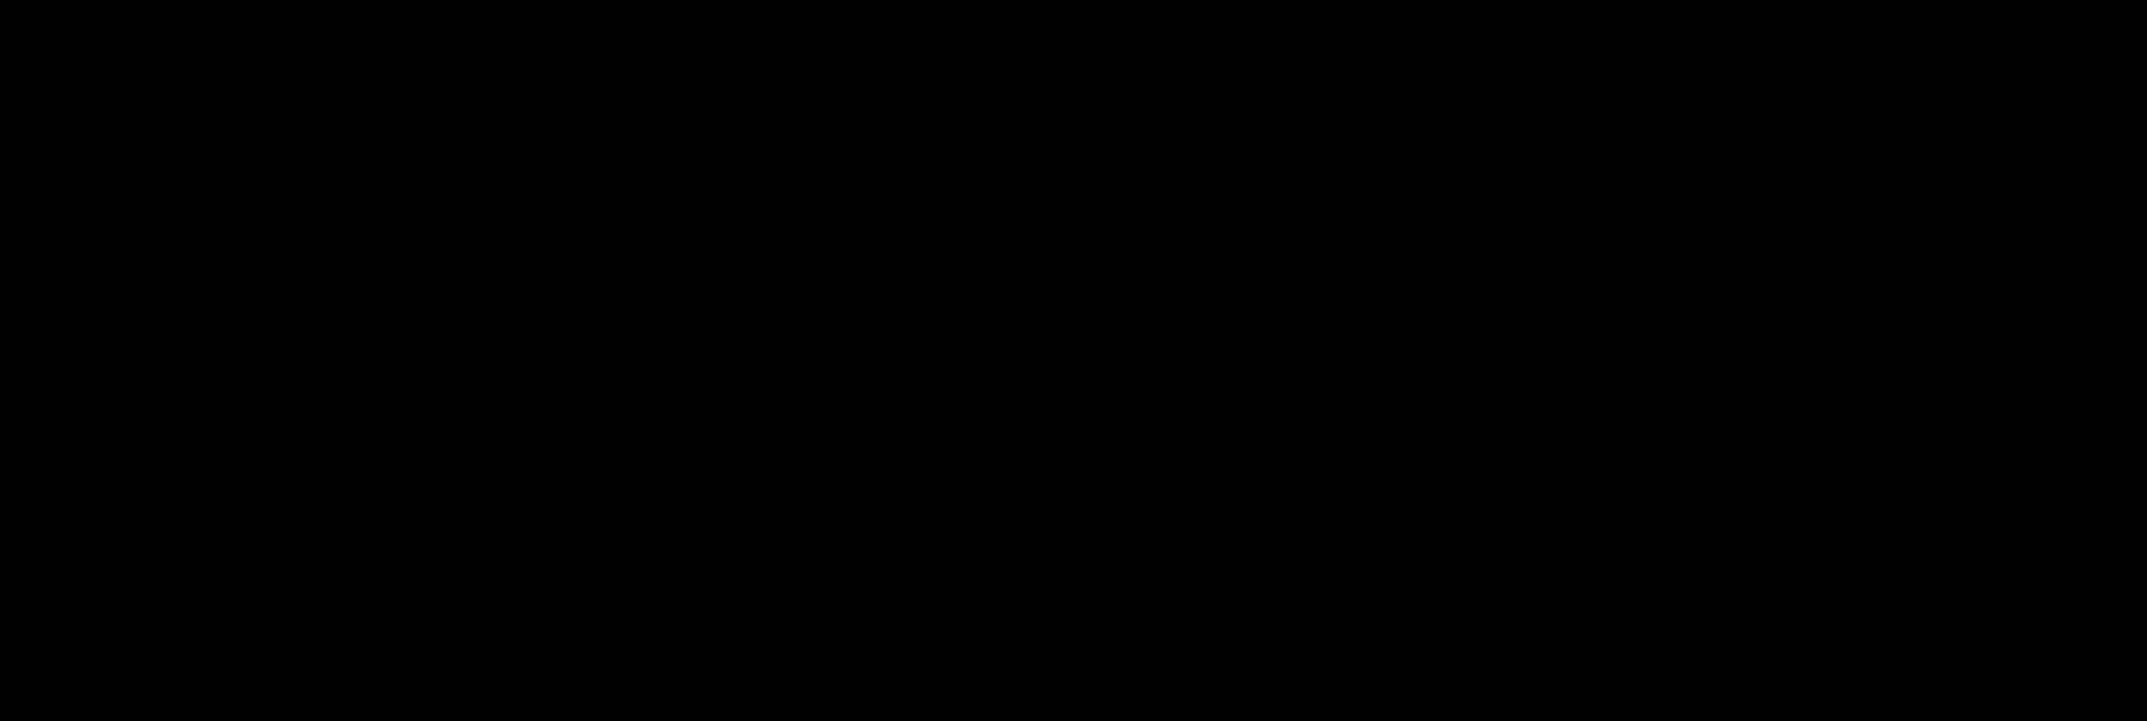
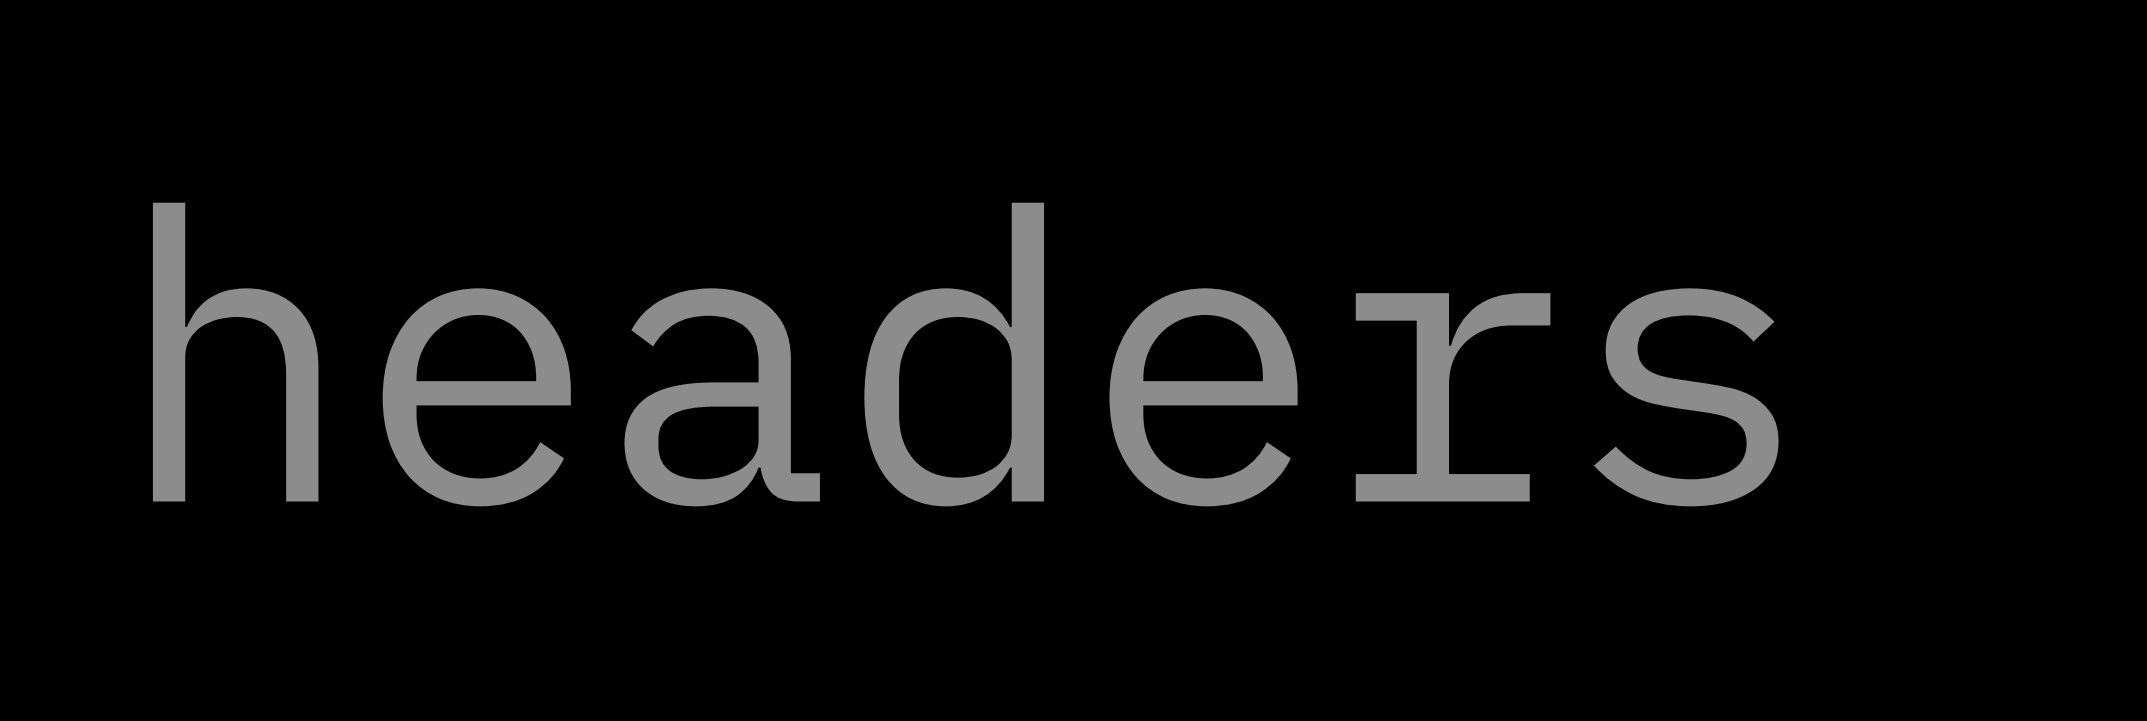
text: none -> headers (965, 354)

